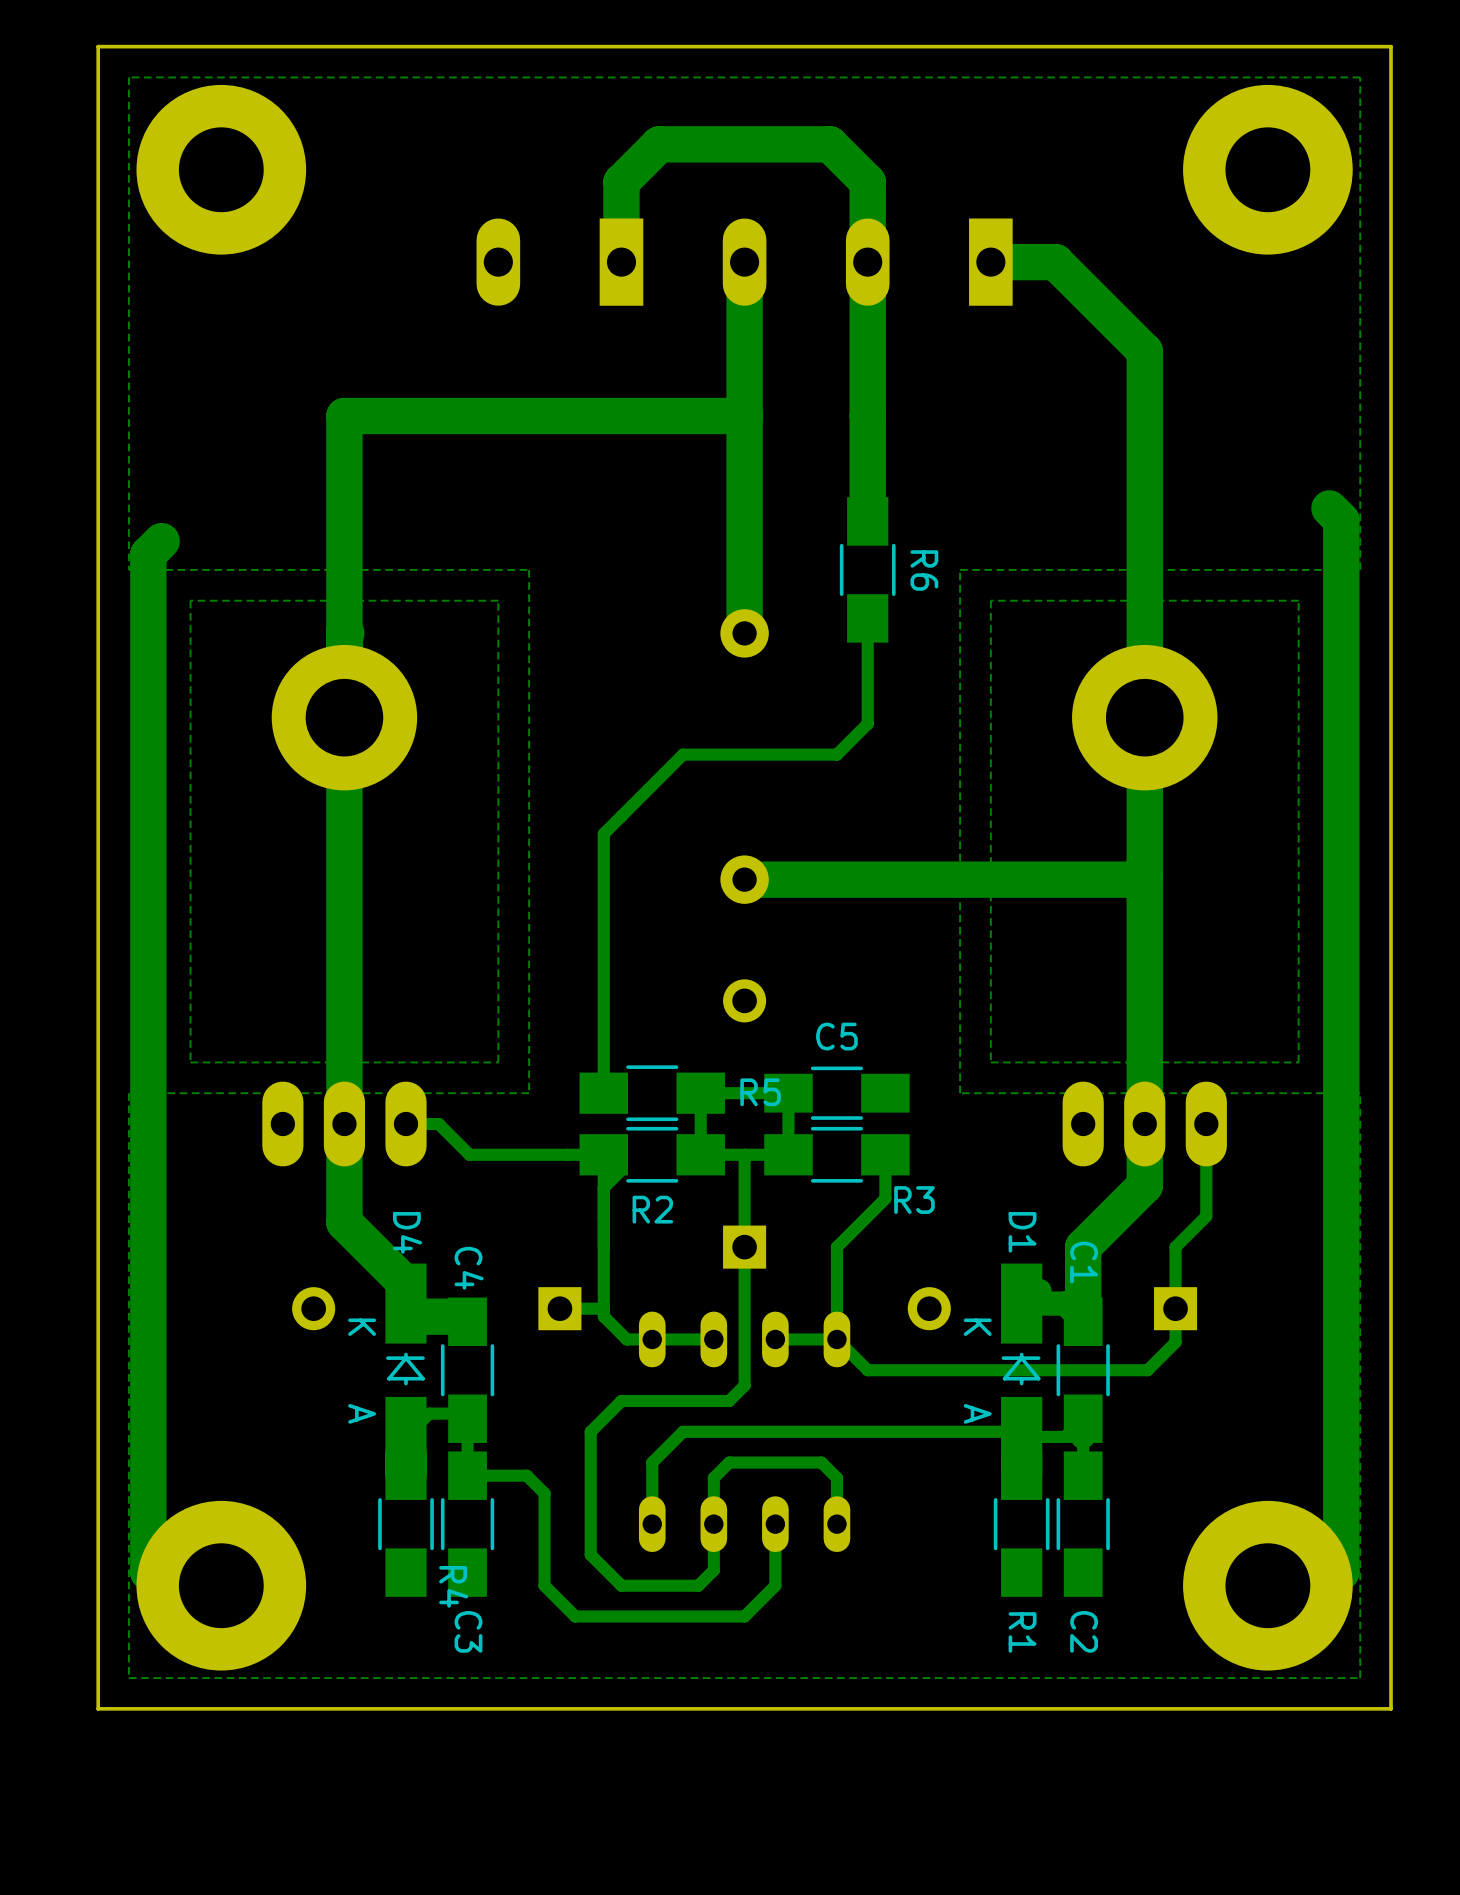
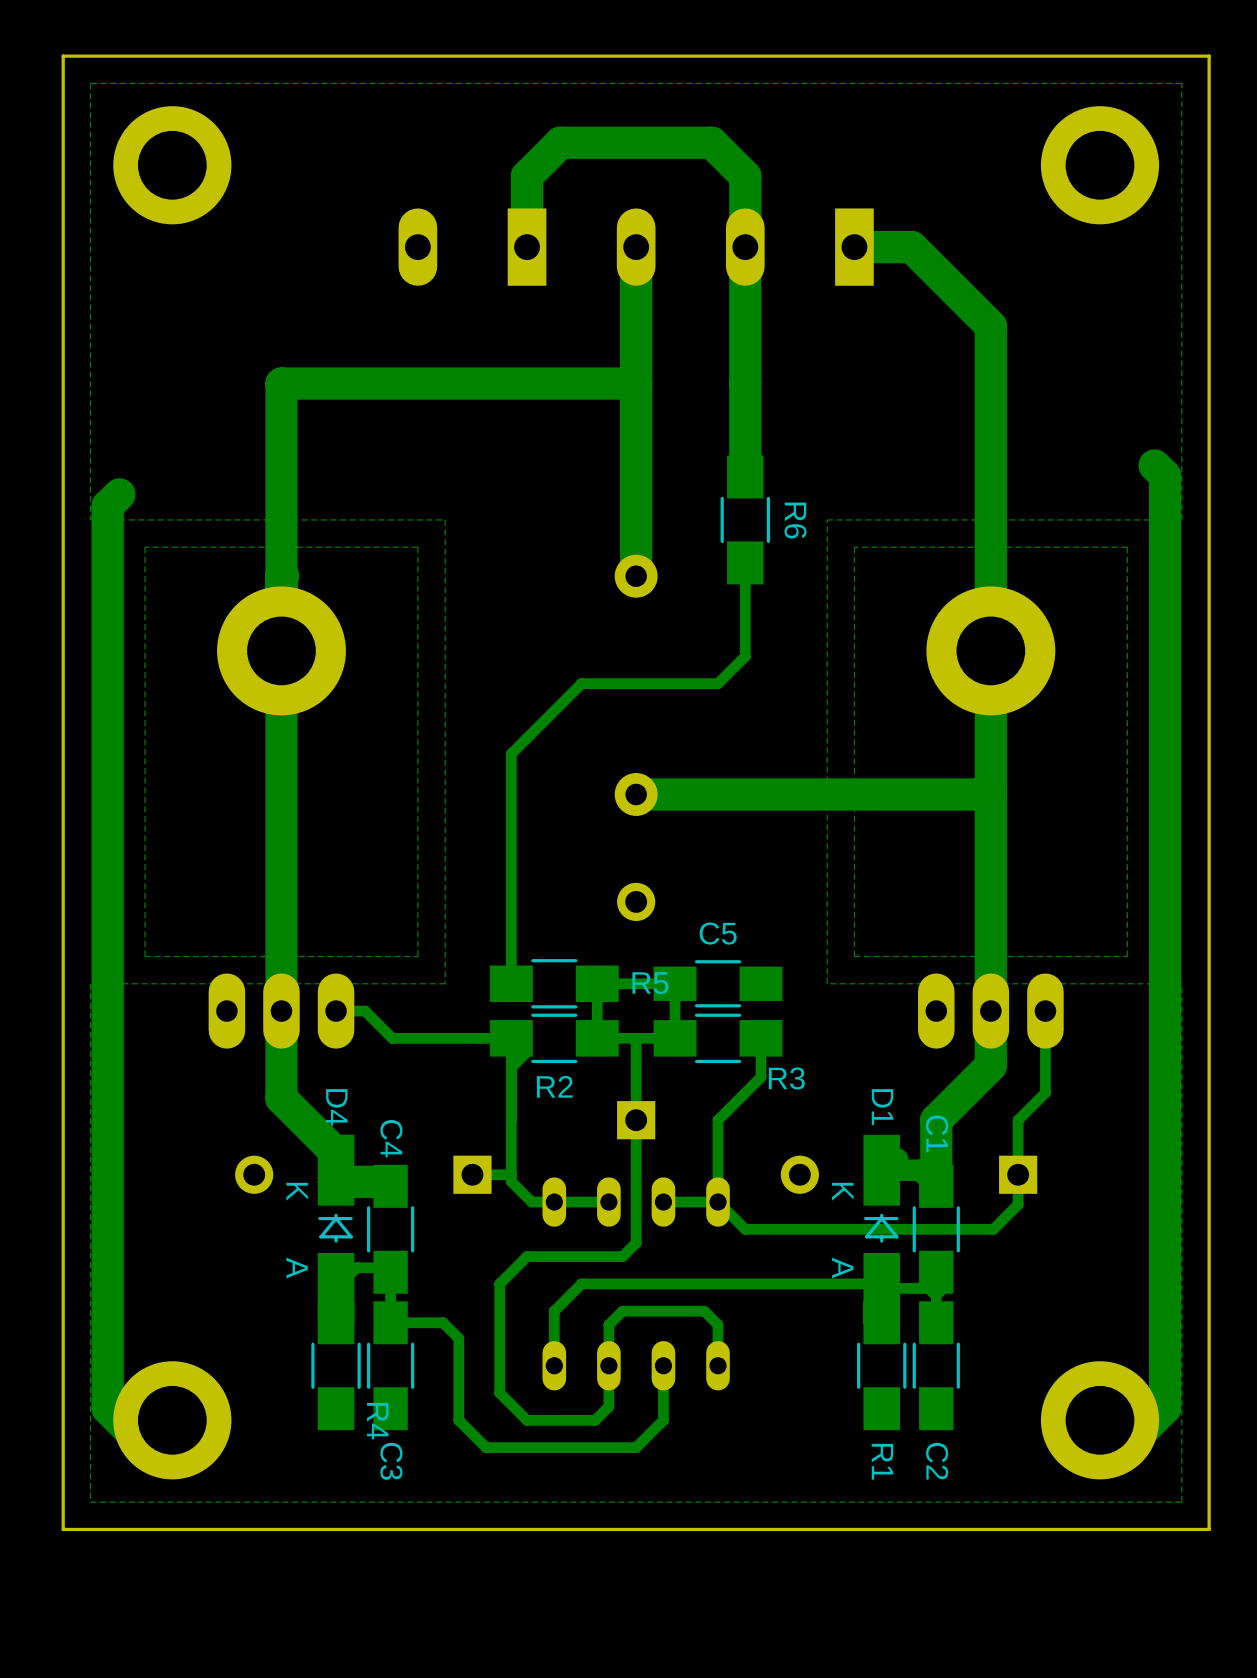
part footprint: [136, 84, 307, 255] -> [113, 106, 232, 225]
part footprint: [1183, 84, 1353, 255] -> [1040, 106, 1160, 225]
part footprint: [136, 1500, 307, 1671] -> [113, 1361, 232, 1480]
part footprint: [1183, 1500, 1353, 1671] -> [1040, 1361, 1160, 1480]

